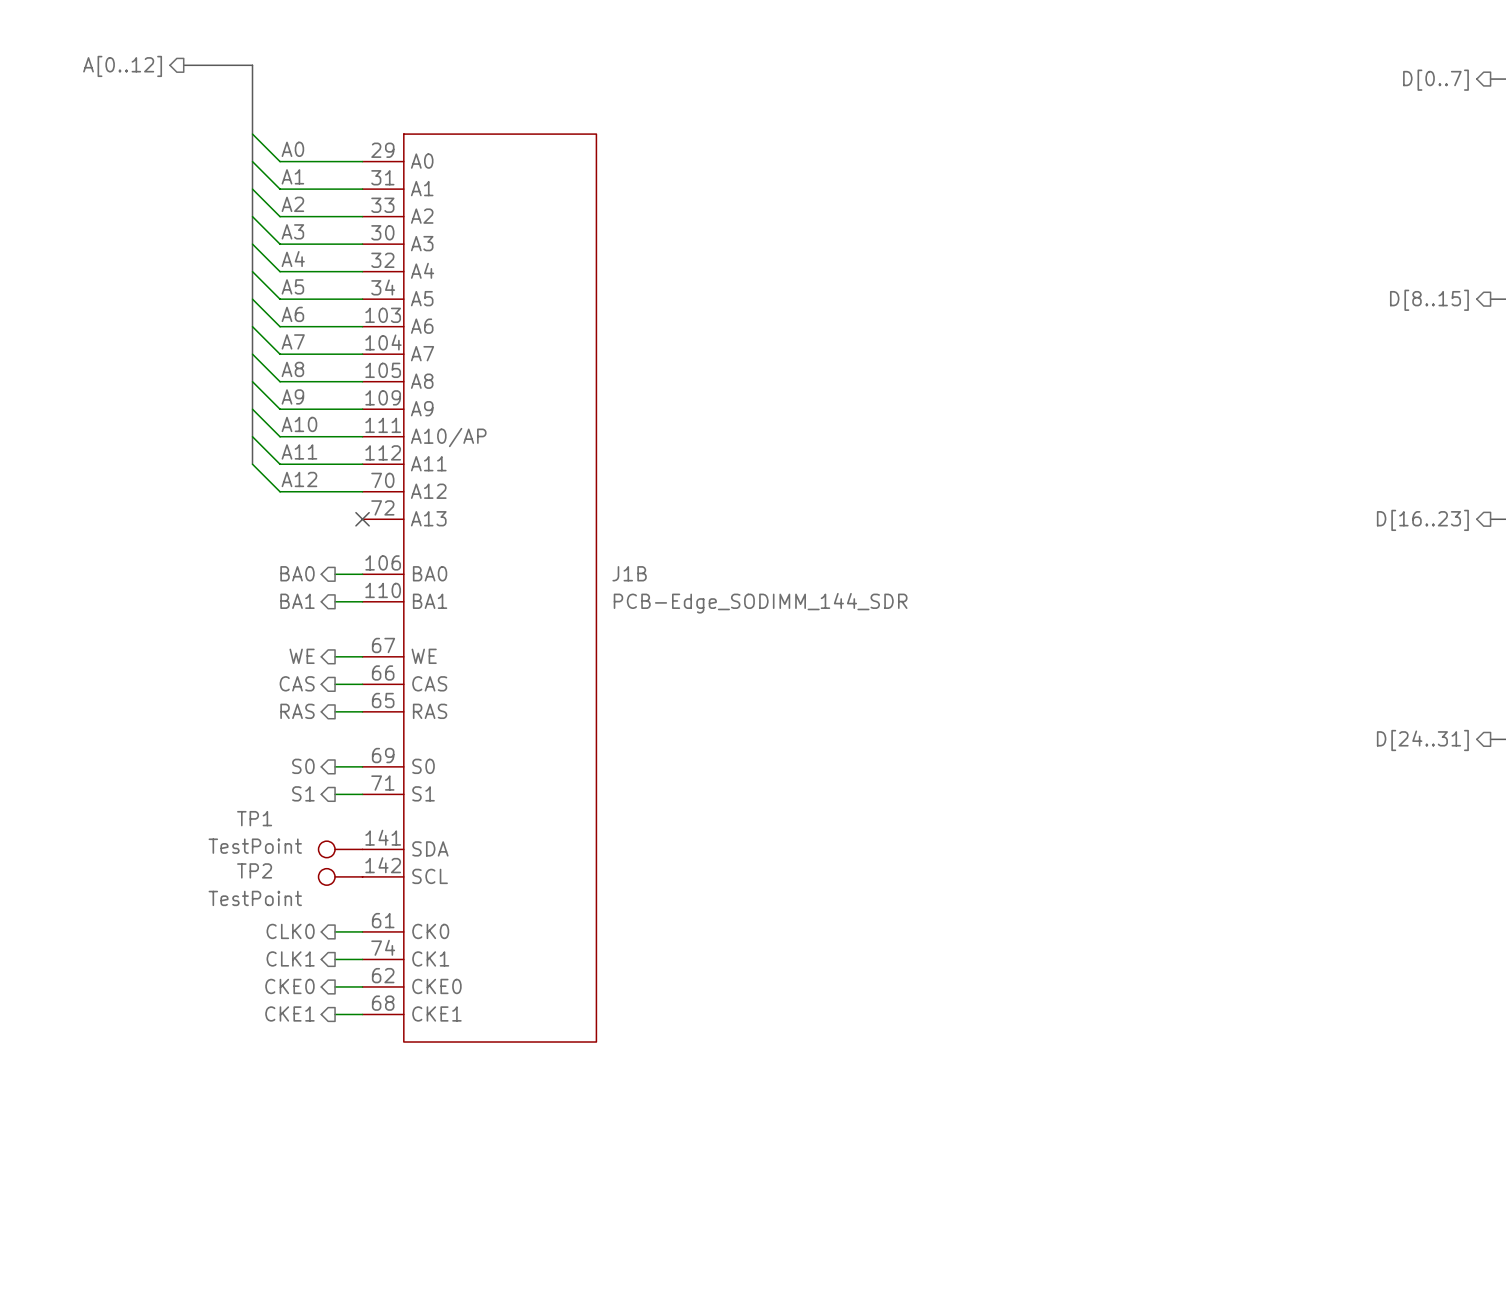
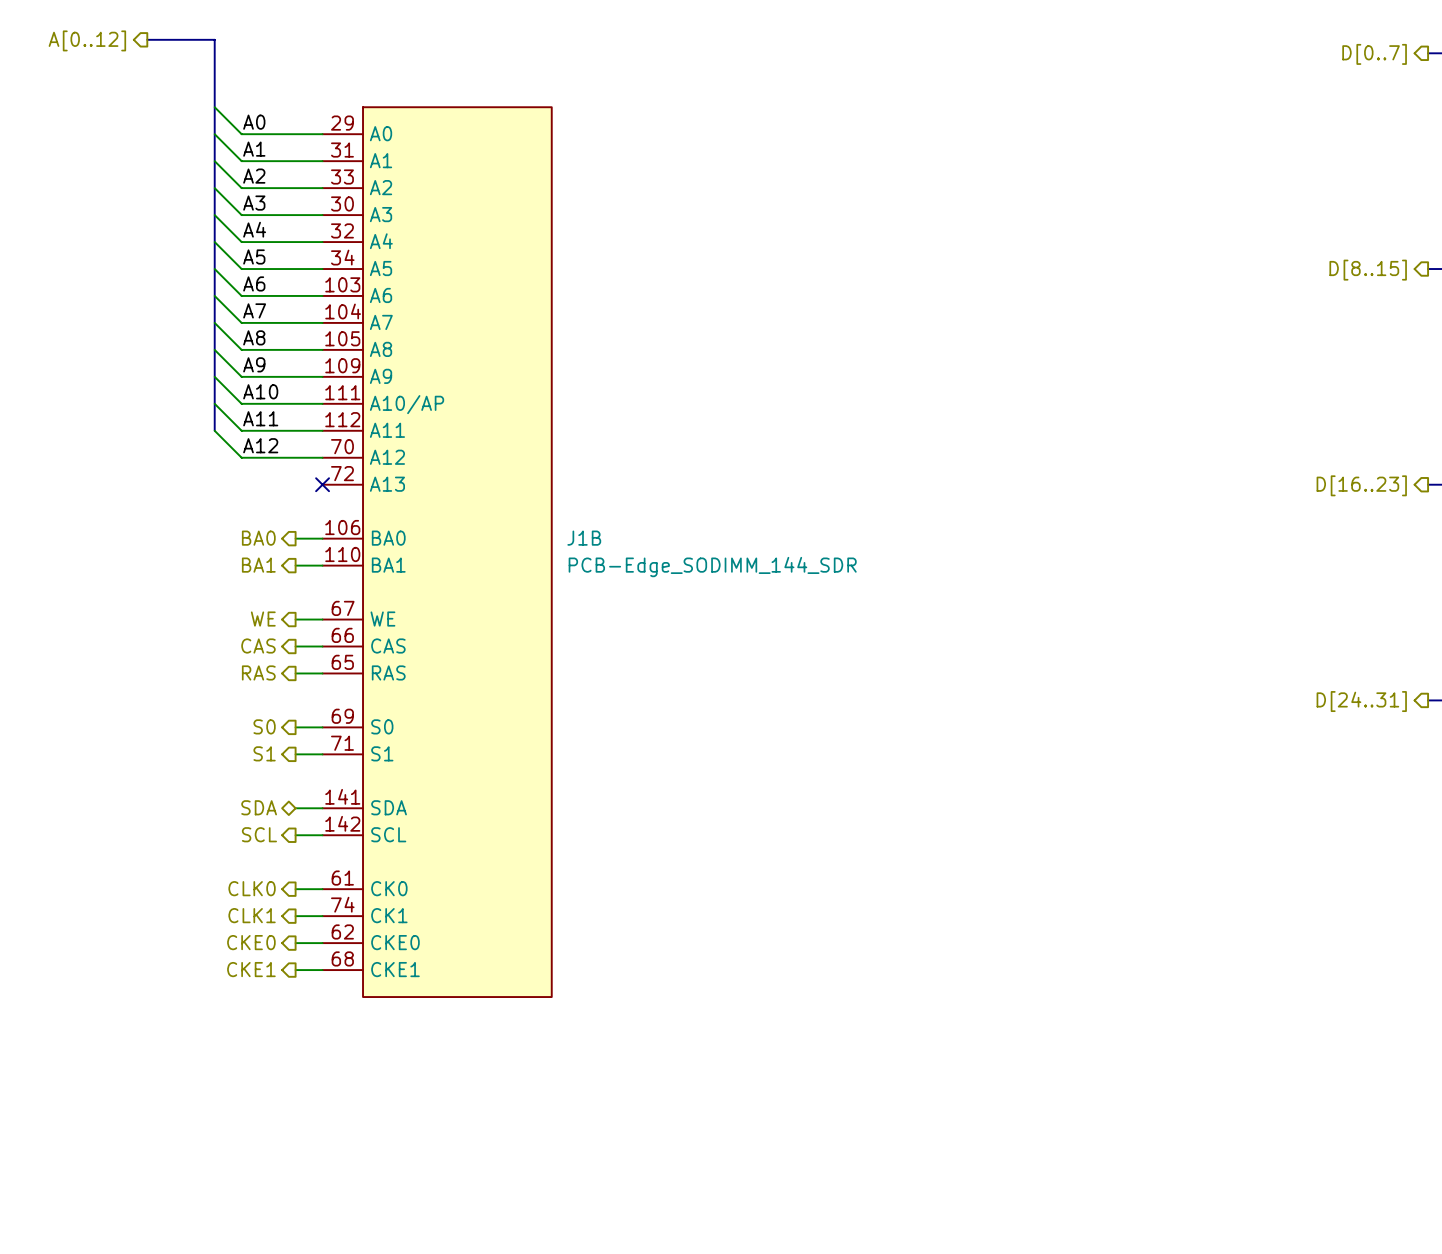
hierarchical label: none -> SDA (259, 807)
TP1: TestPoint (340, 849) -> none
hierarchical label: none -> SCL (259, 834)
TP2: TestPoint (340, 876) -> none

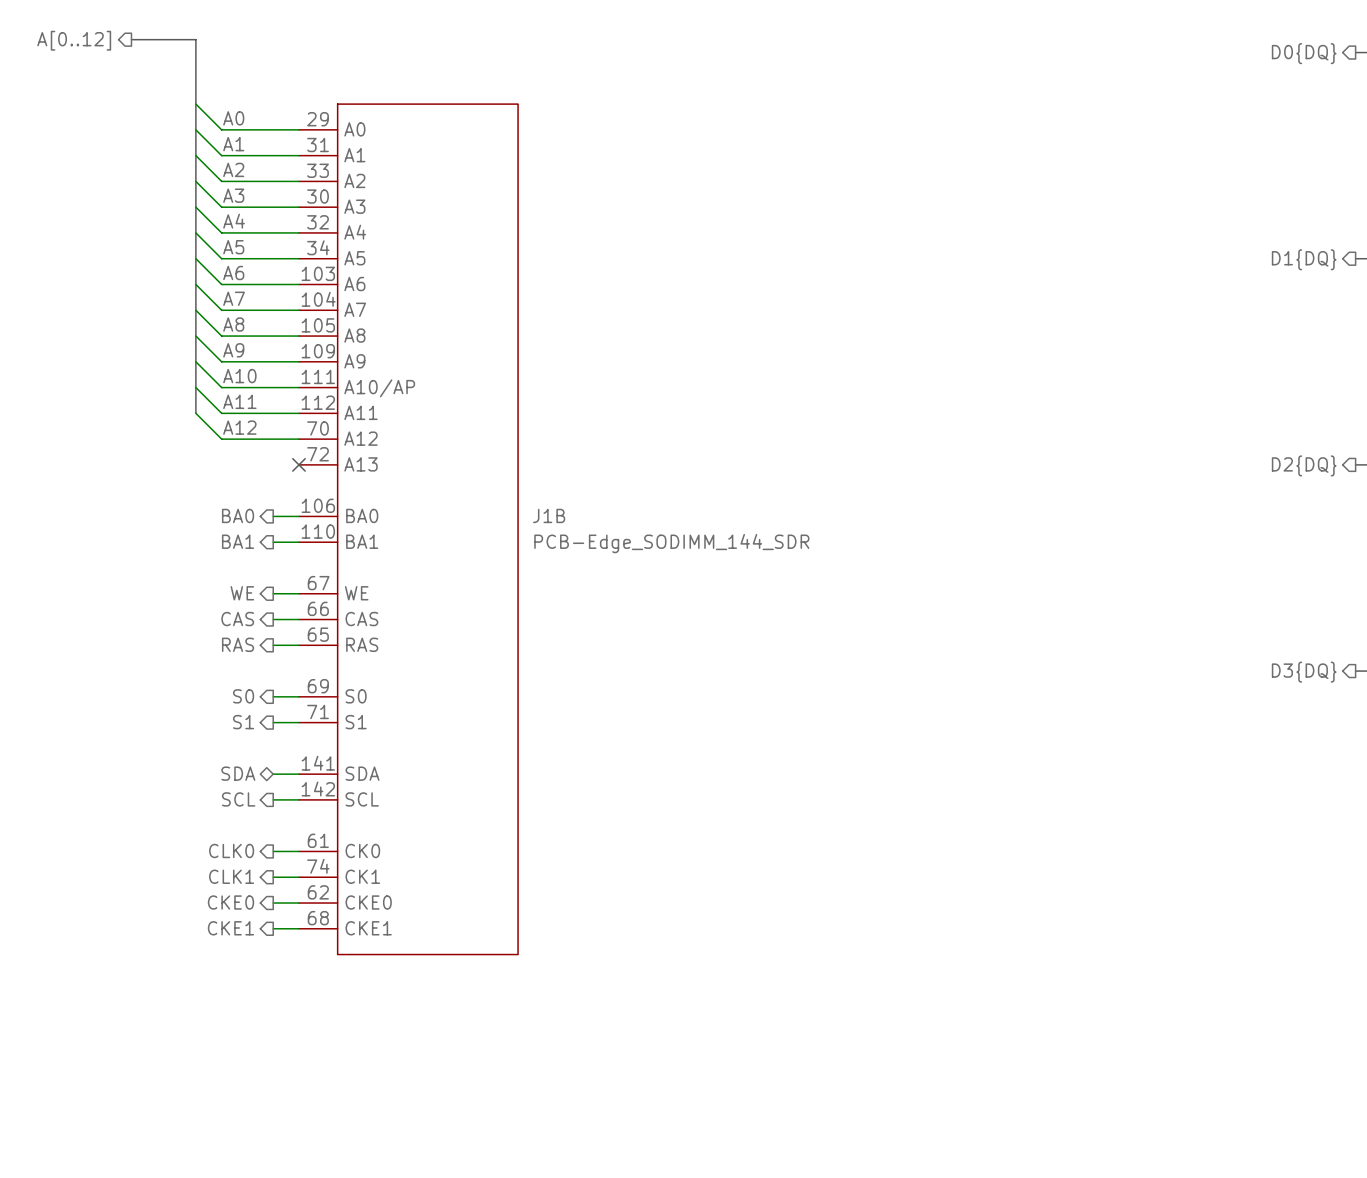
hierarchical label: D[0..7] (1374, 54) -> D0{DQ} (1304, 53)
hierarchical label: D[8..15] (1368, 270) -> D1{DQ} (1304, 259)
hierarchical label: D[16..23] (1361, 485) -> D2{DQ} (1304, 465)
hierarchical label: D[24..31] (1361, 701) -> D3{DQ} (1304, 672)

